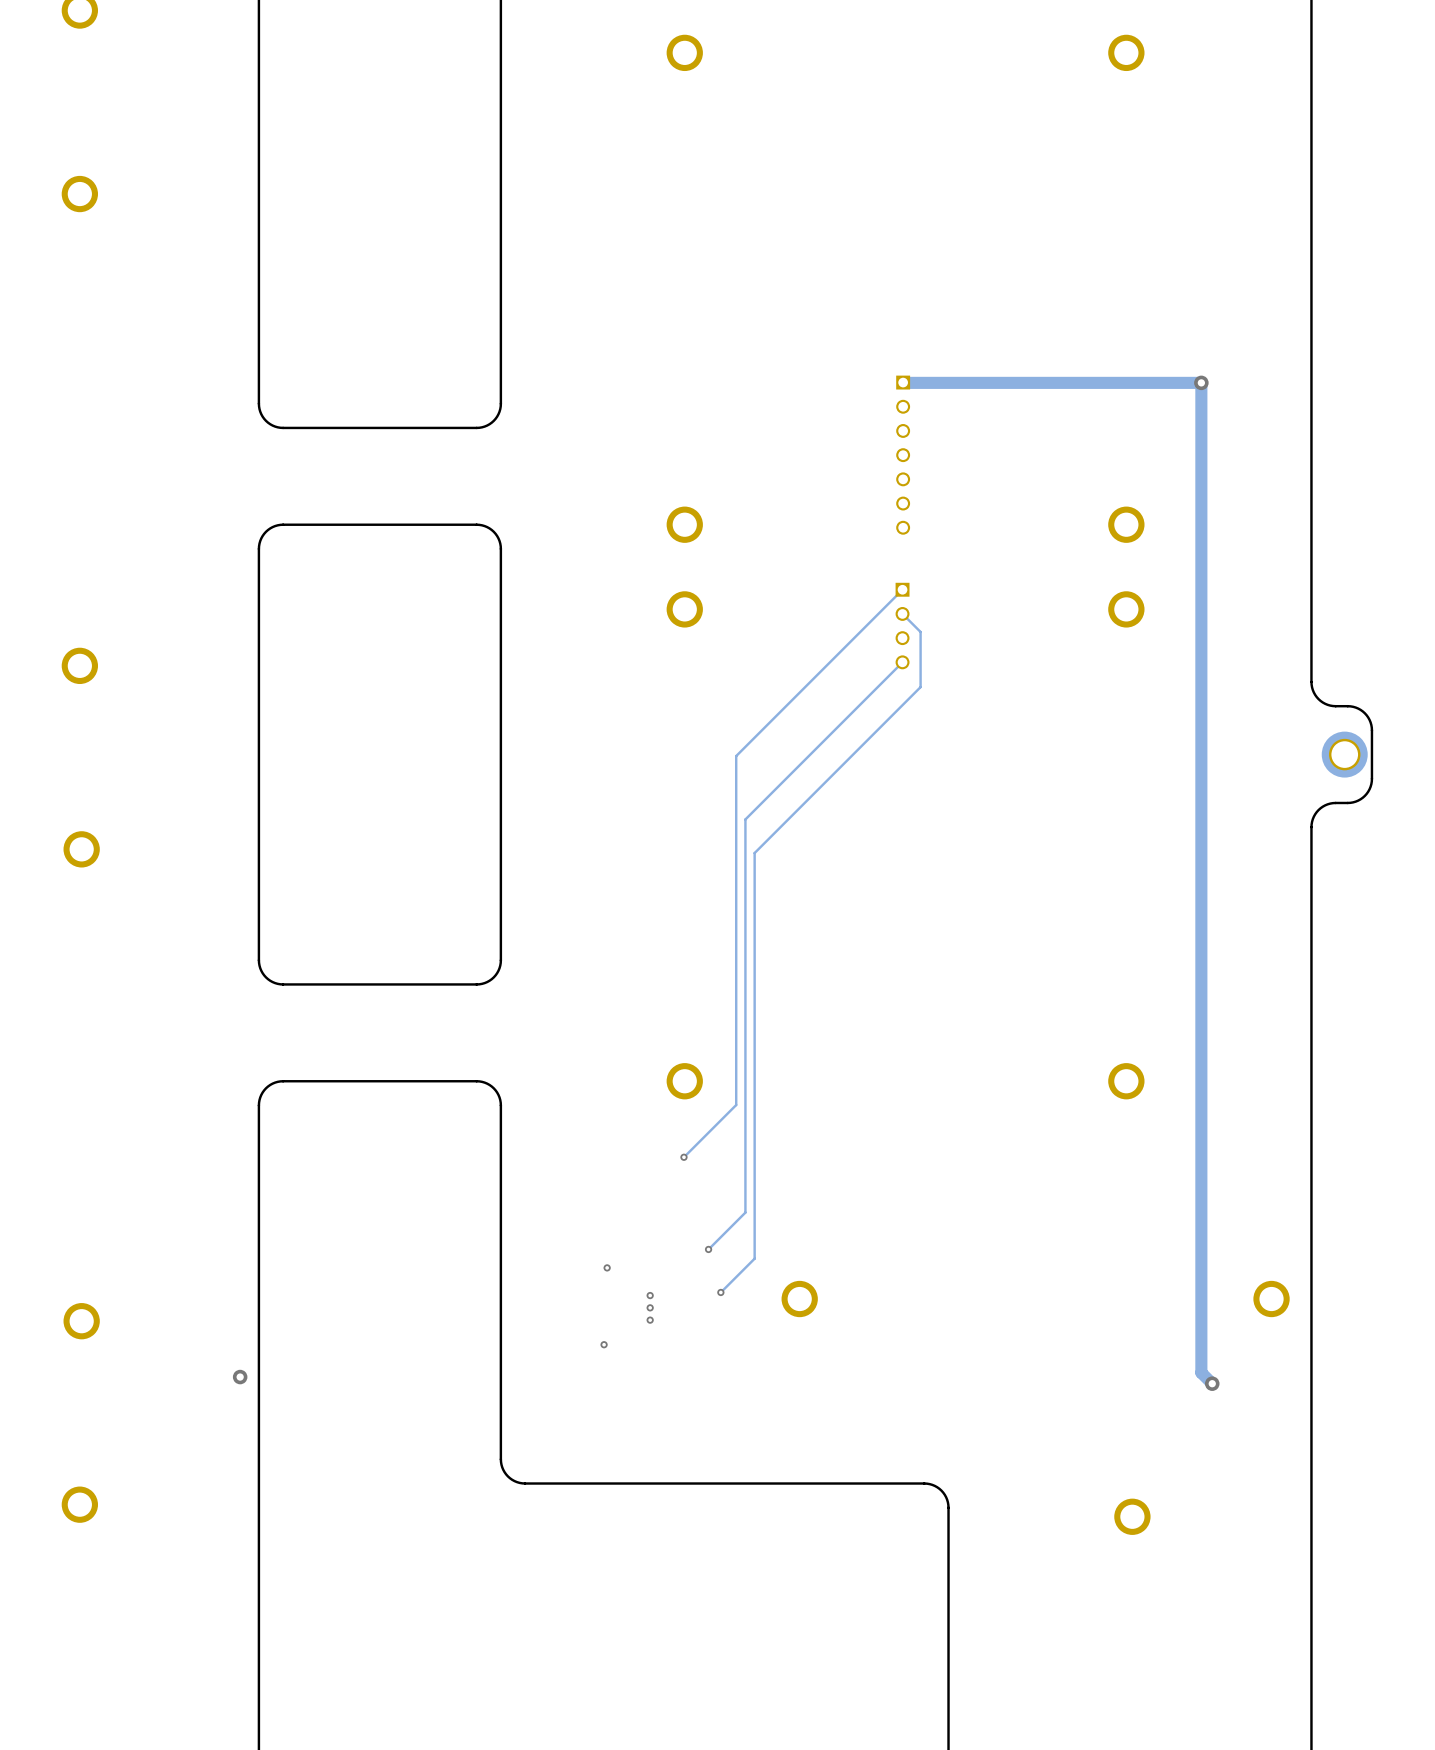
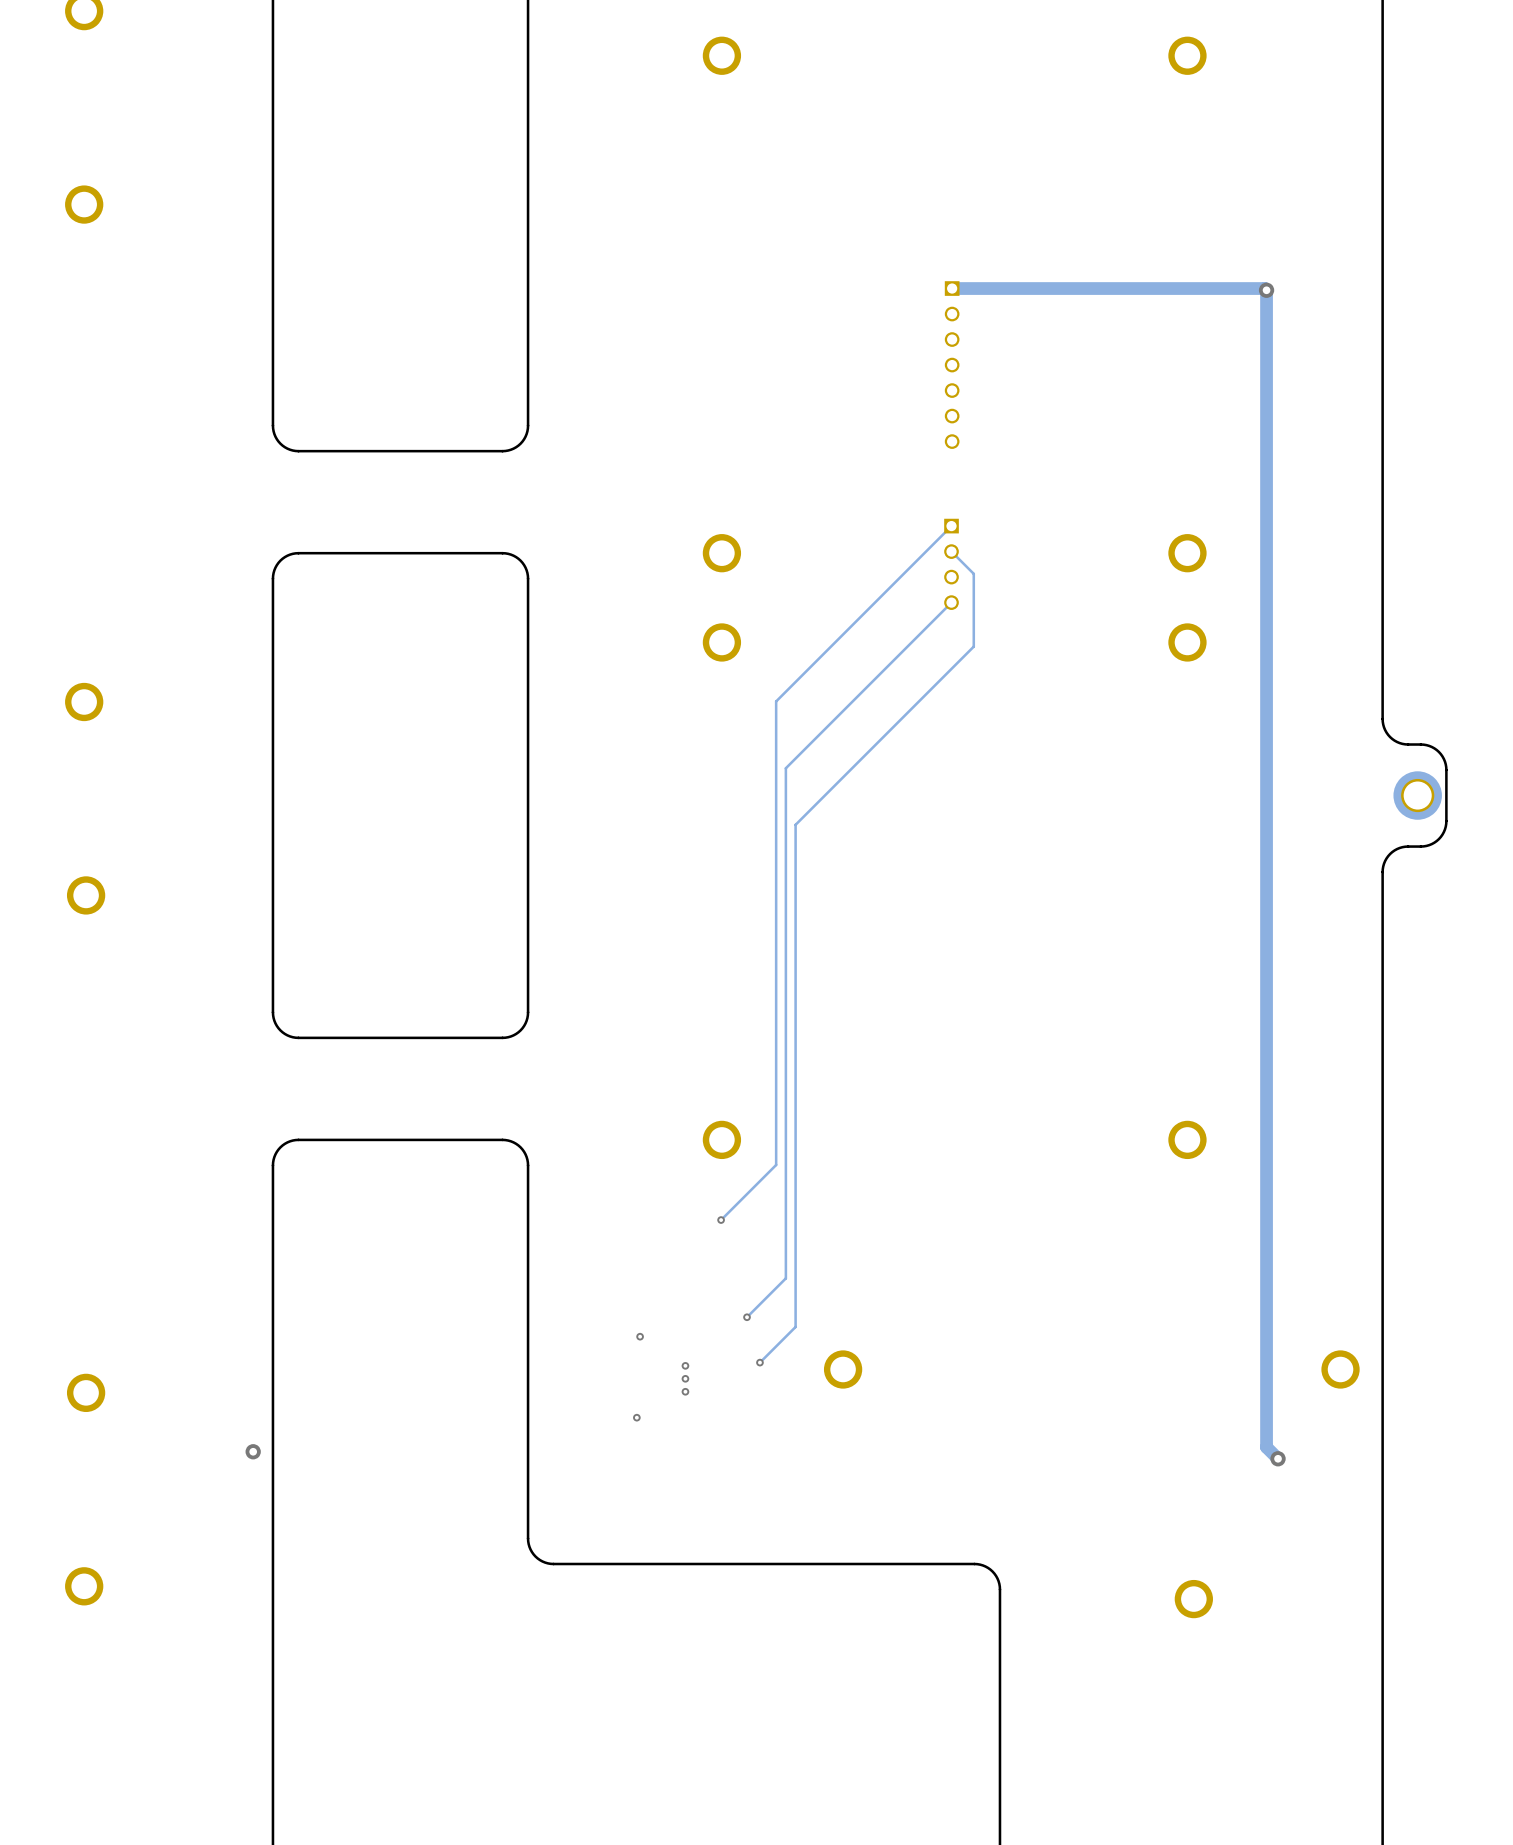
via: none -> (1266, 290)
track: (903, 382) (1201, 382) -> (952, 288) (1264, 288) (1266, 290) (1266, 403)
via: (1201, 382) -> none
part position: (903, 455) -> (952, 365)
track: (902, 589) (736, 756) -> (951, 526) (776, 701) (776, 797)
track: (902, 613) (920, 631) (920, 687) (754, 853) -> (951, 551) (973, 573) (973, 646) (795, 824) (795, 899)
part position: (902, 626) -> (951, 564)
track: (902, 662) (745, 819) -> (951, 602) (785, 768) (785, 863)

